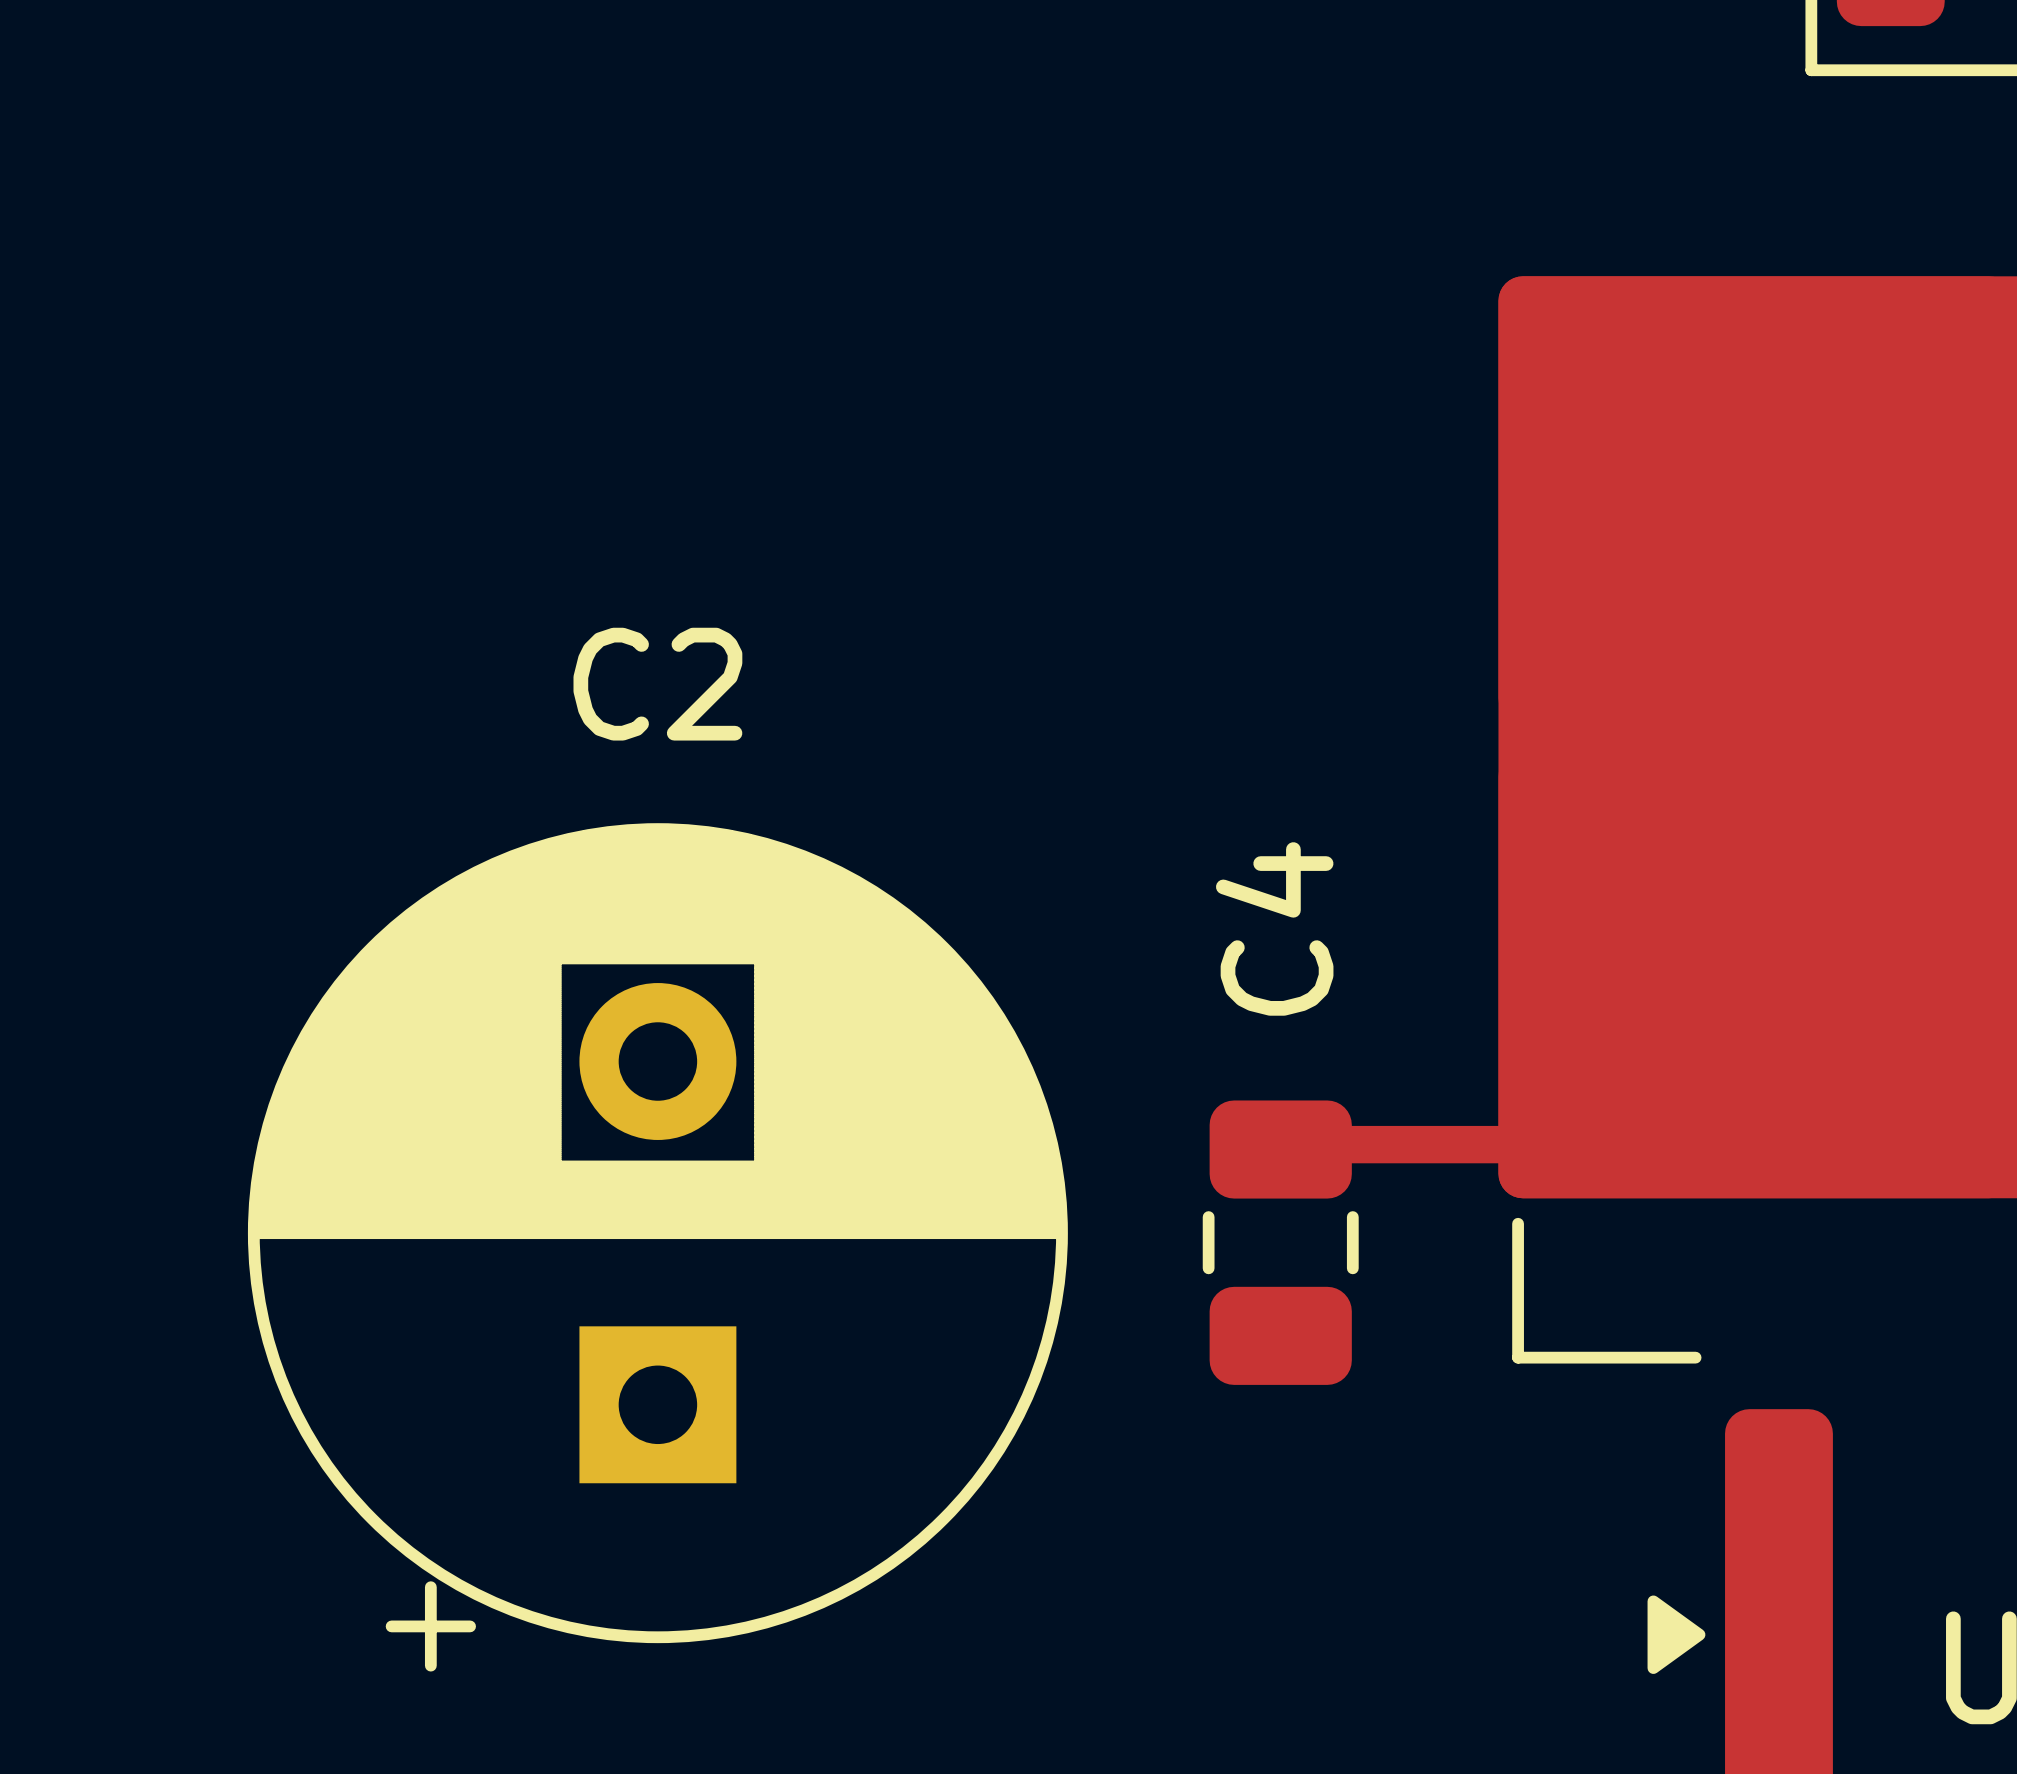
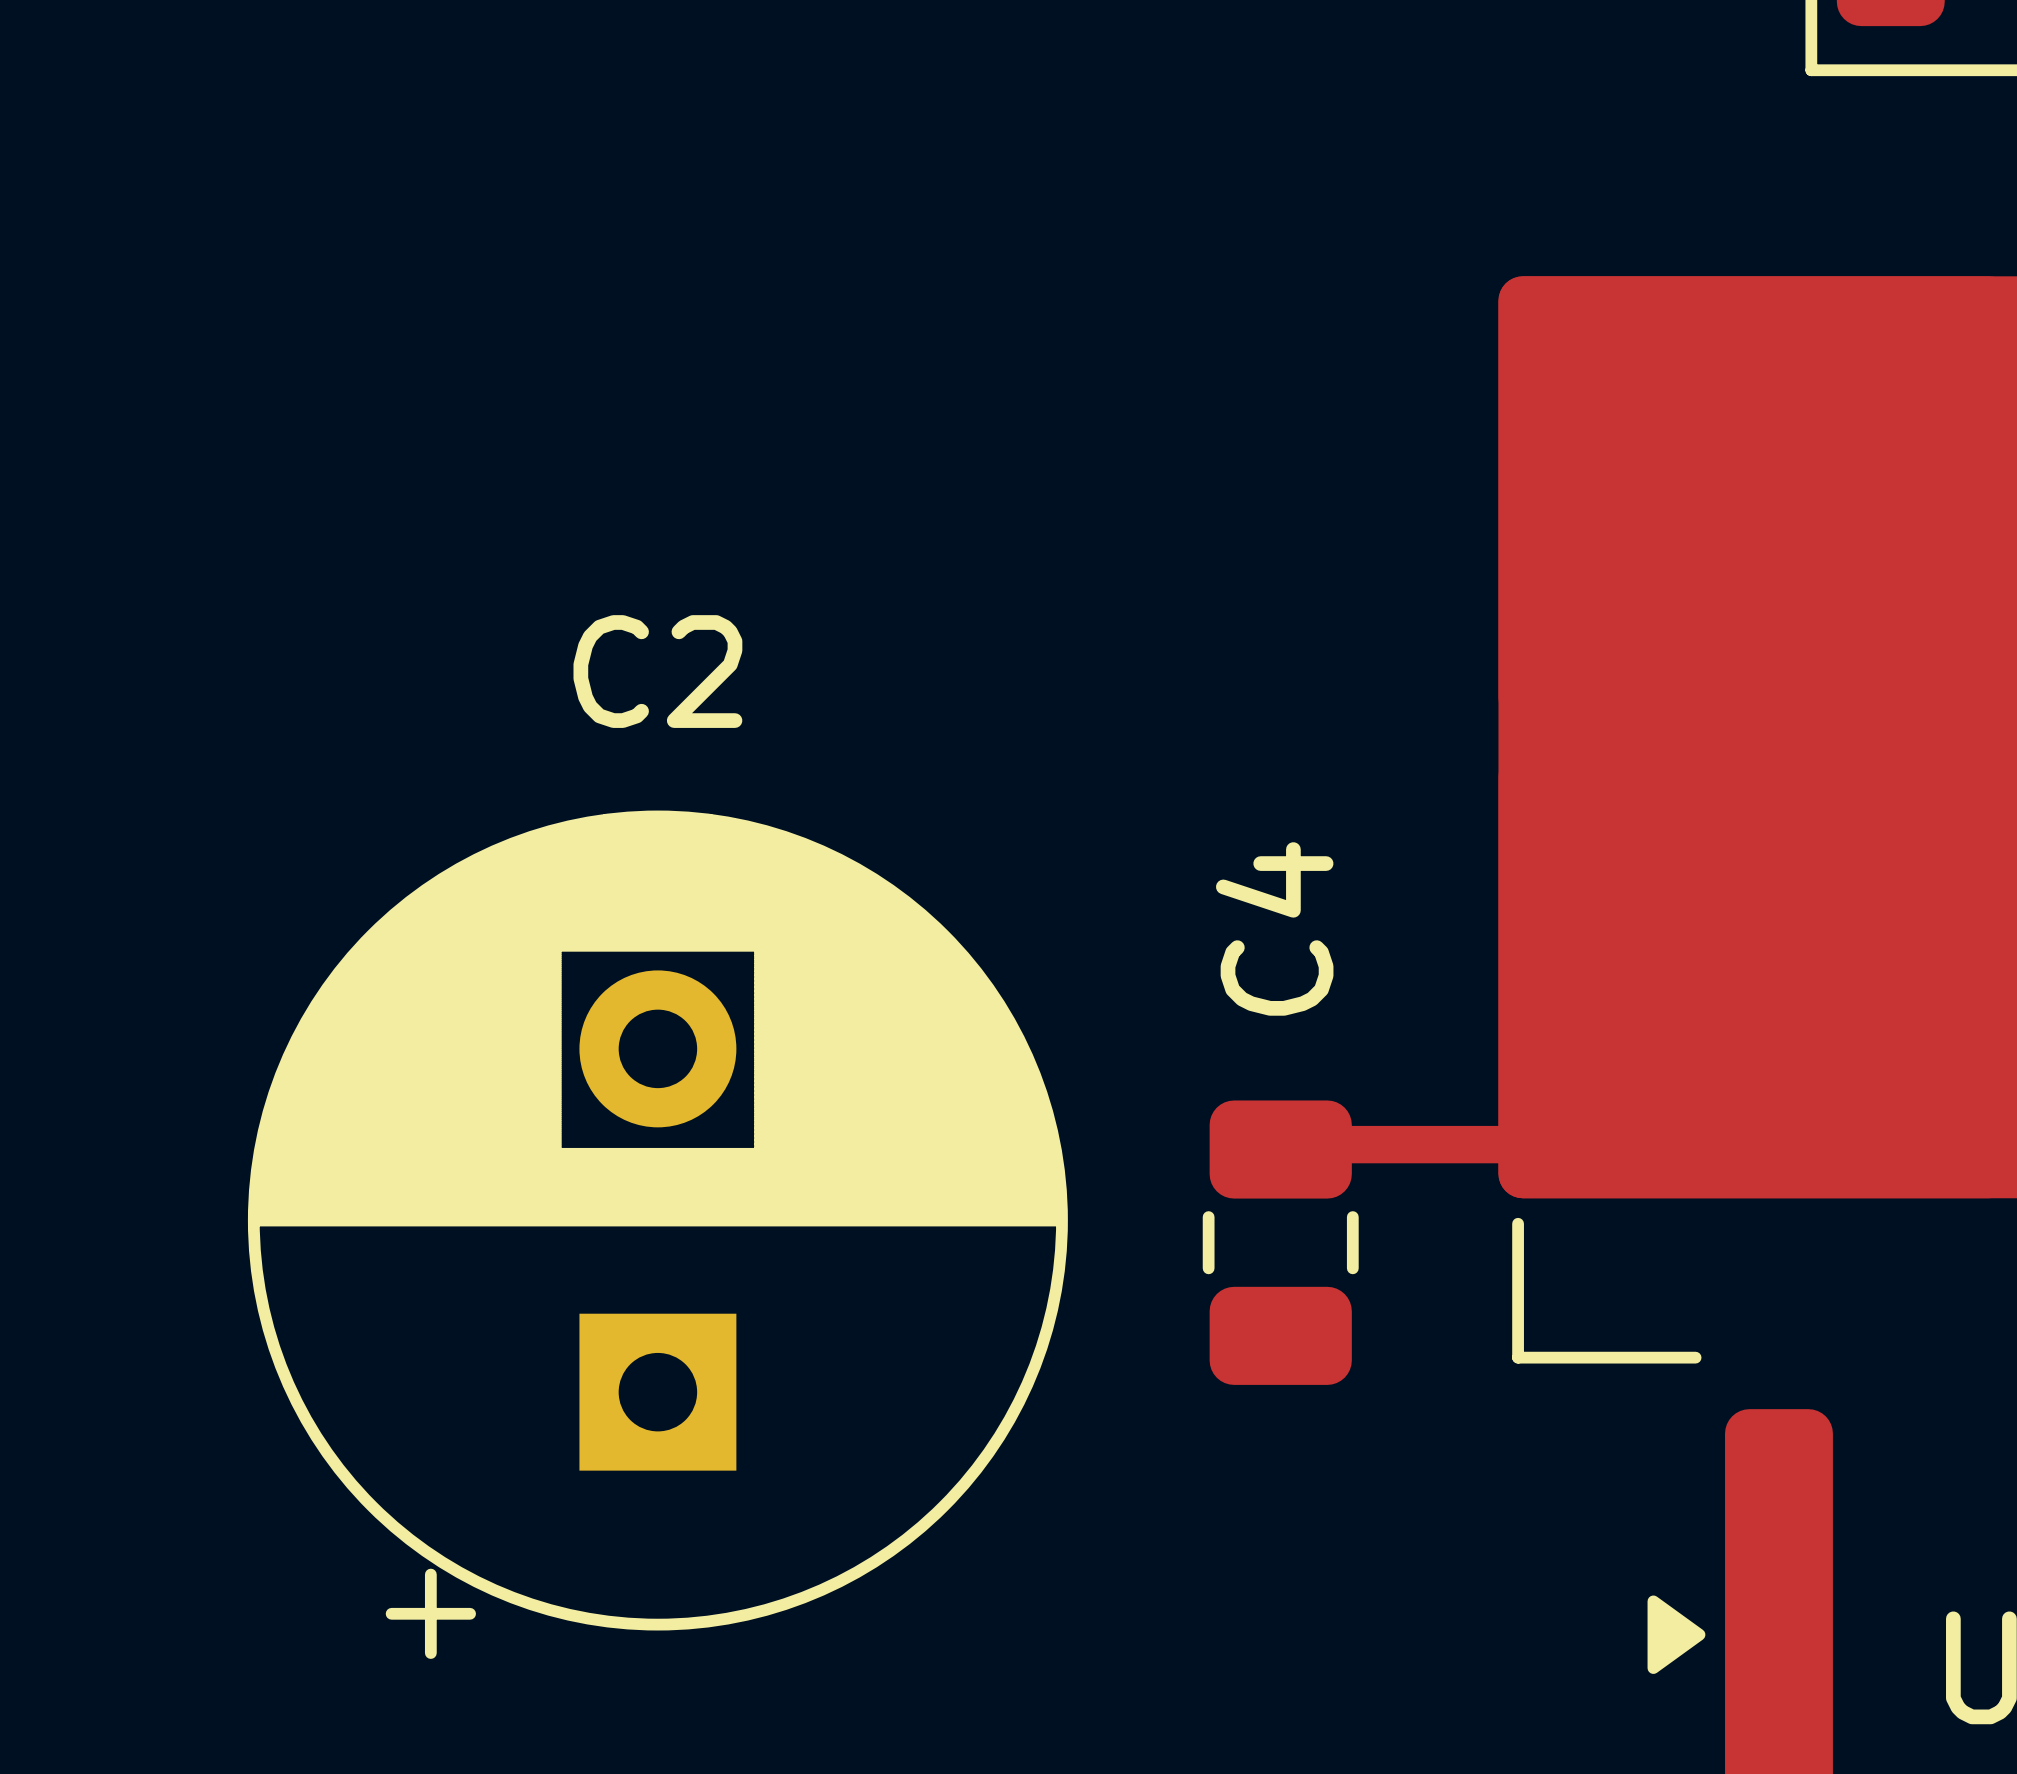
C2 position: (657, 1247) -> (657, 1234)

